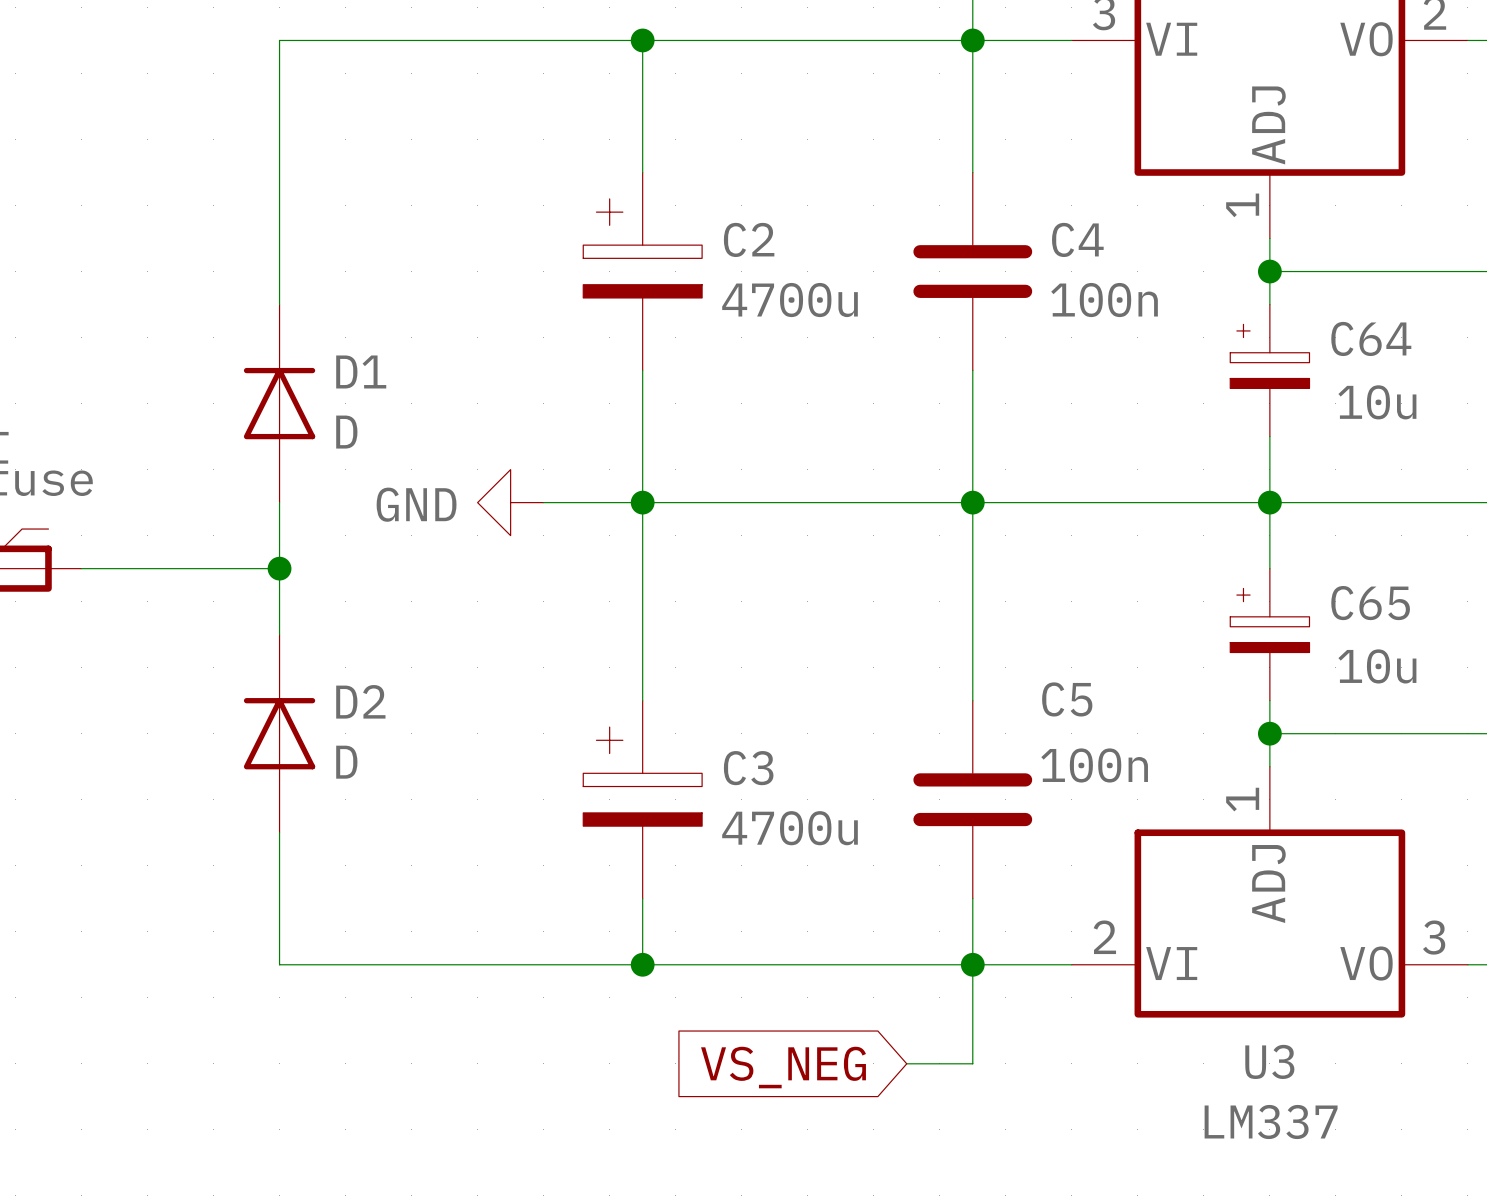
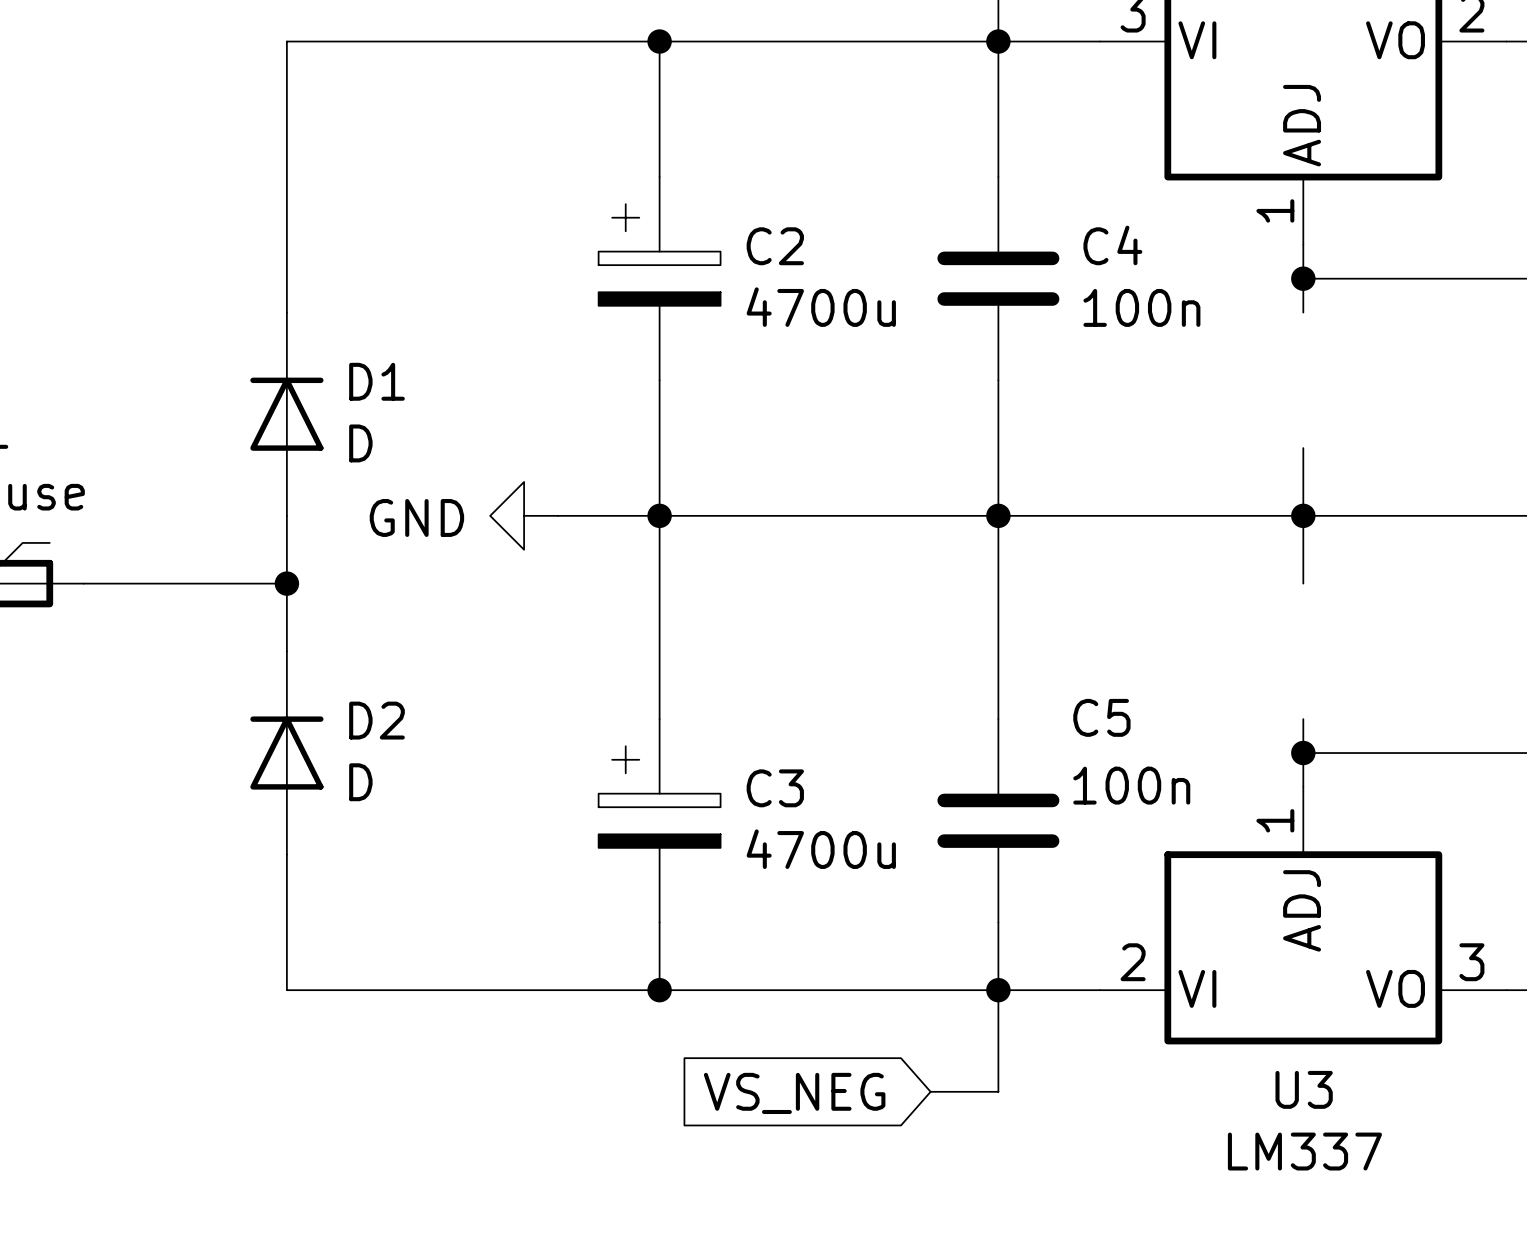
C64: 10u (1269, 370) -> none
C65: 10u (1269, 634) -> none

